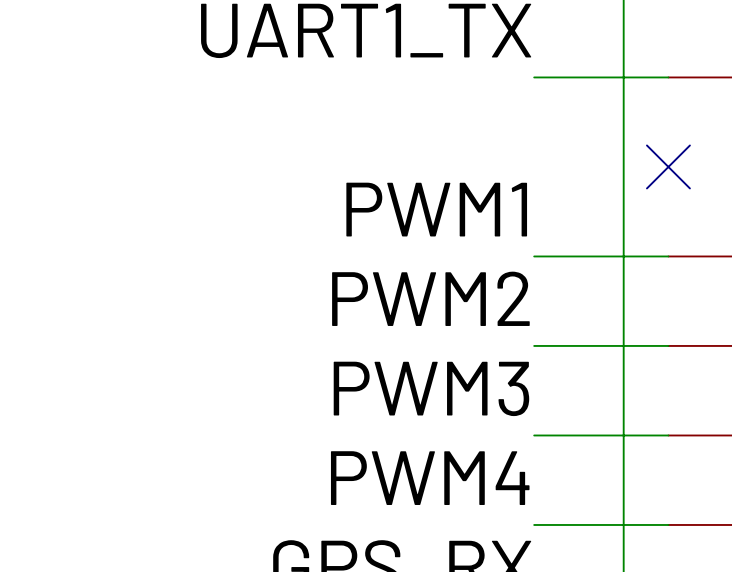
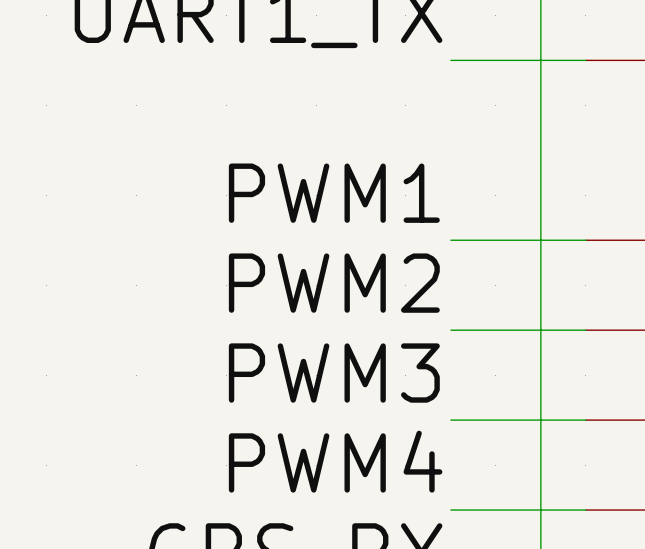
no-connect mark: (668, 166) -> none

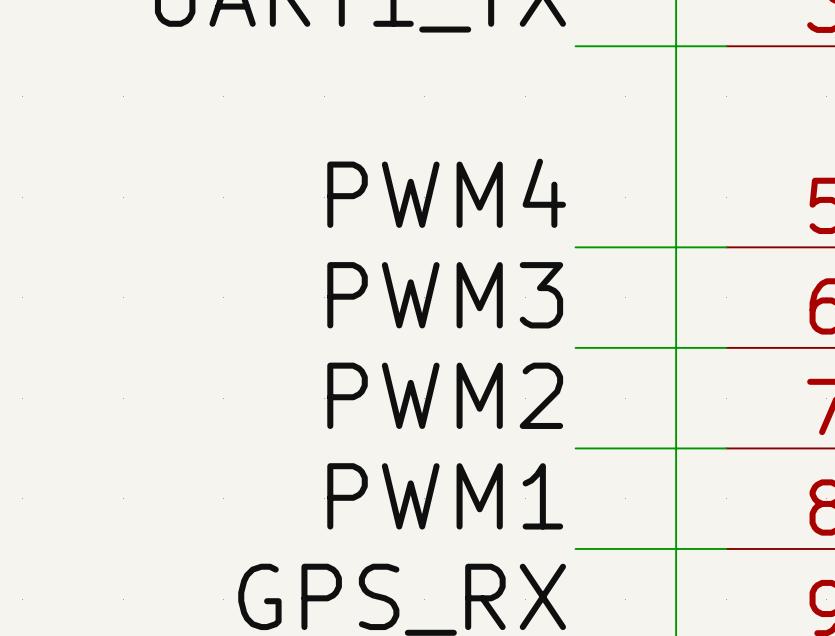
label: PWM1 (334, 193) -> PWM4 (446, 193)
label: PWM2 (334, 283) -> PWM3 (445, 295)
label: PWM3 (334, 373) -> PWM2 (445, 395)
label: PWM4 (335, 461) -> PWM1 (445, 496)

